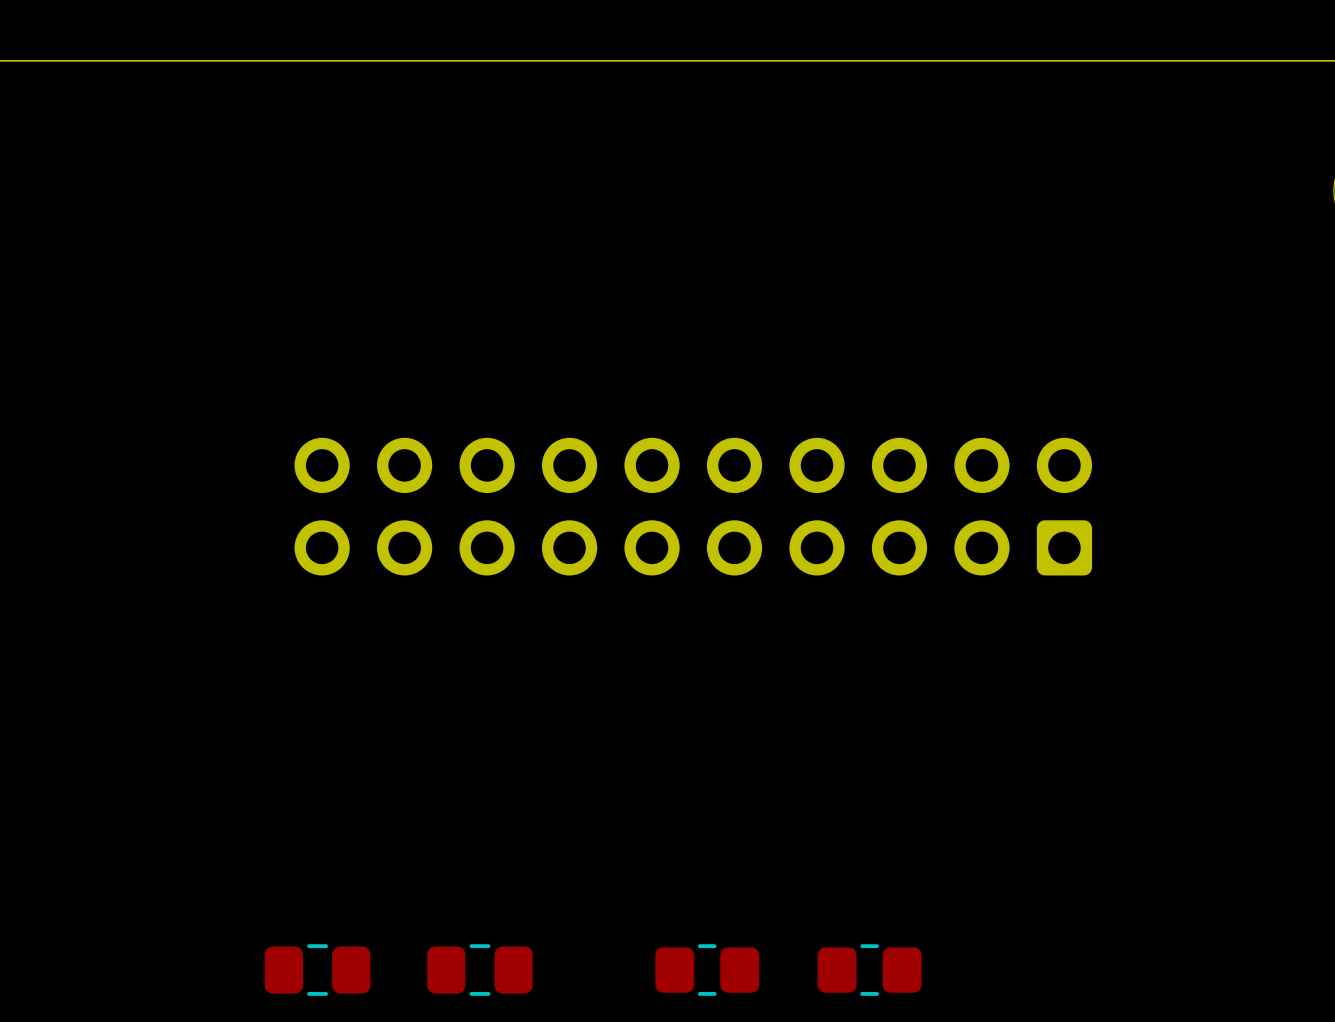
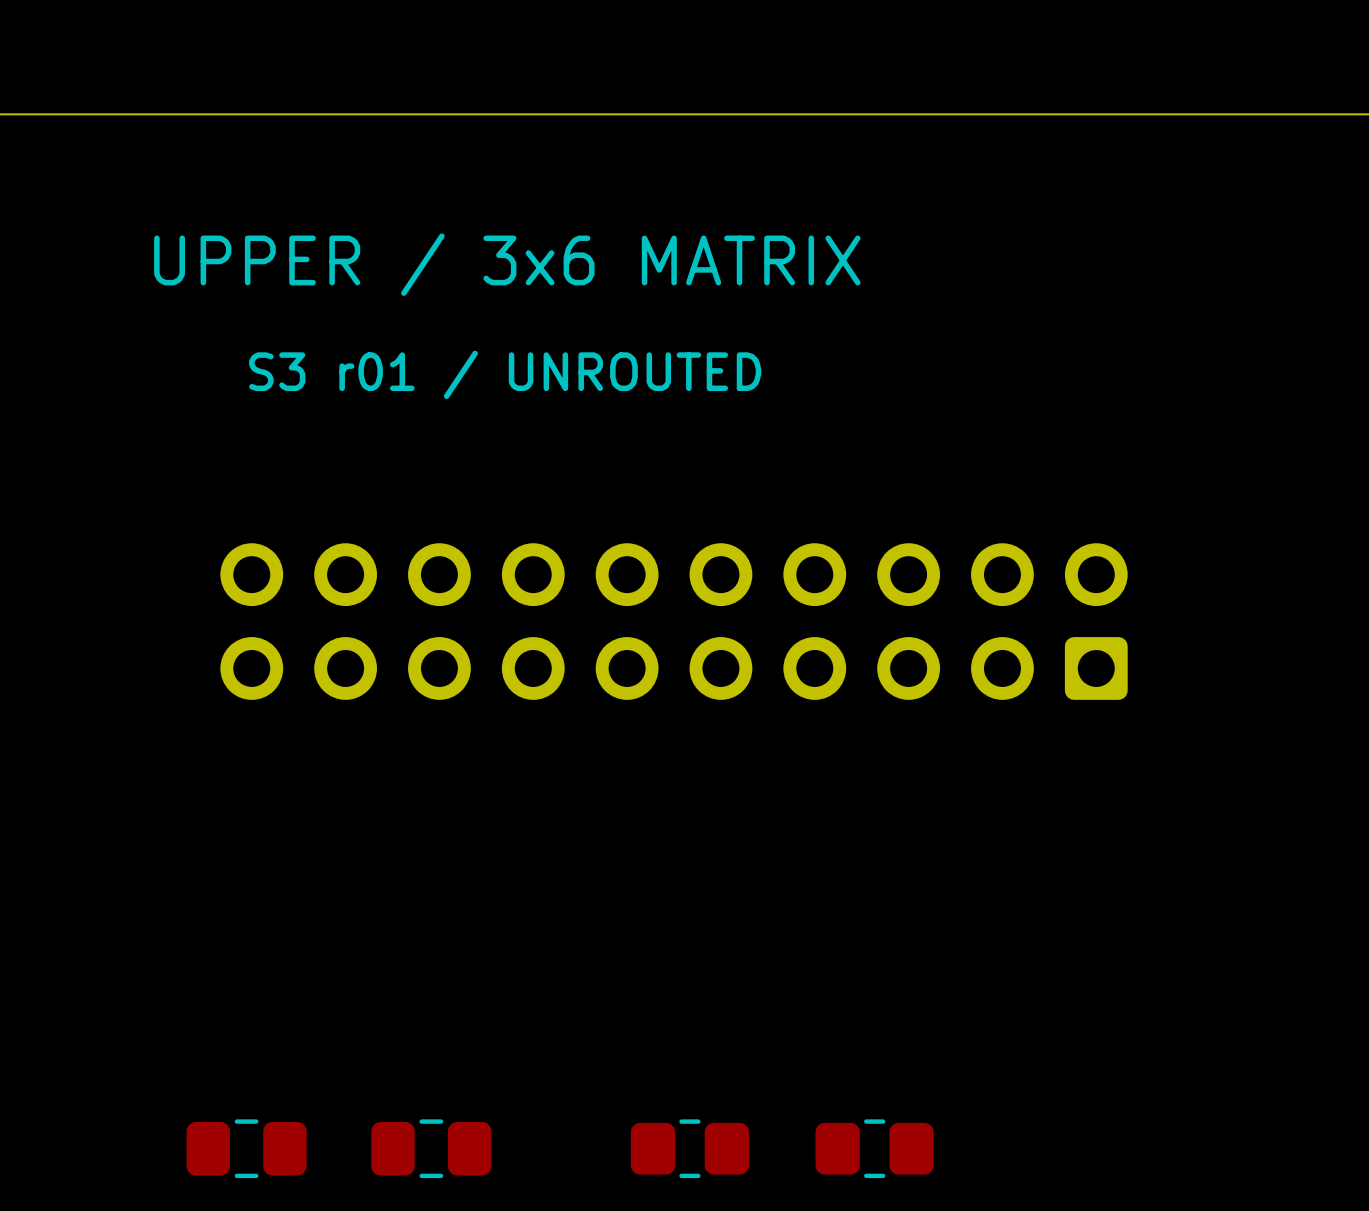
text: none -> UPPER / 3x6 MATRIX (507, 264)
text: none -> S3 r01 / UNROUTED (505, 374)

